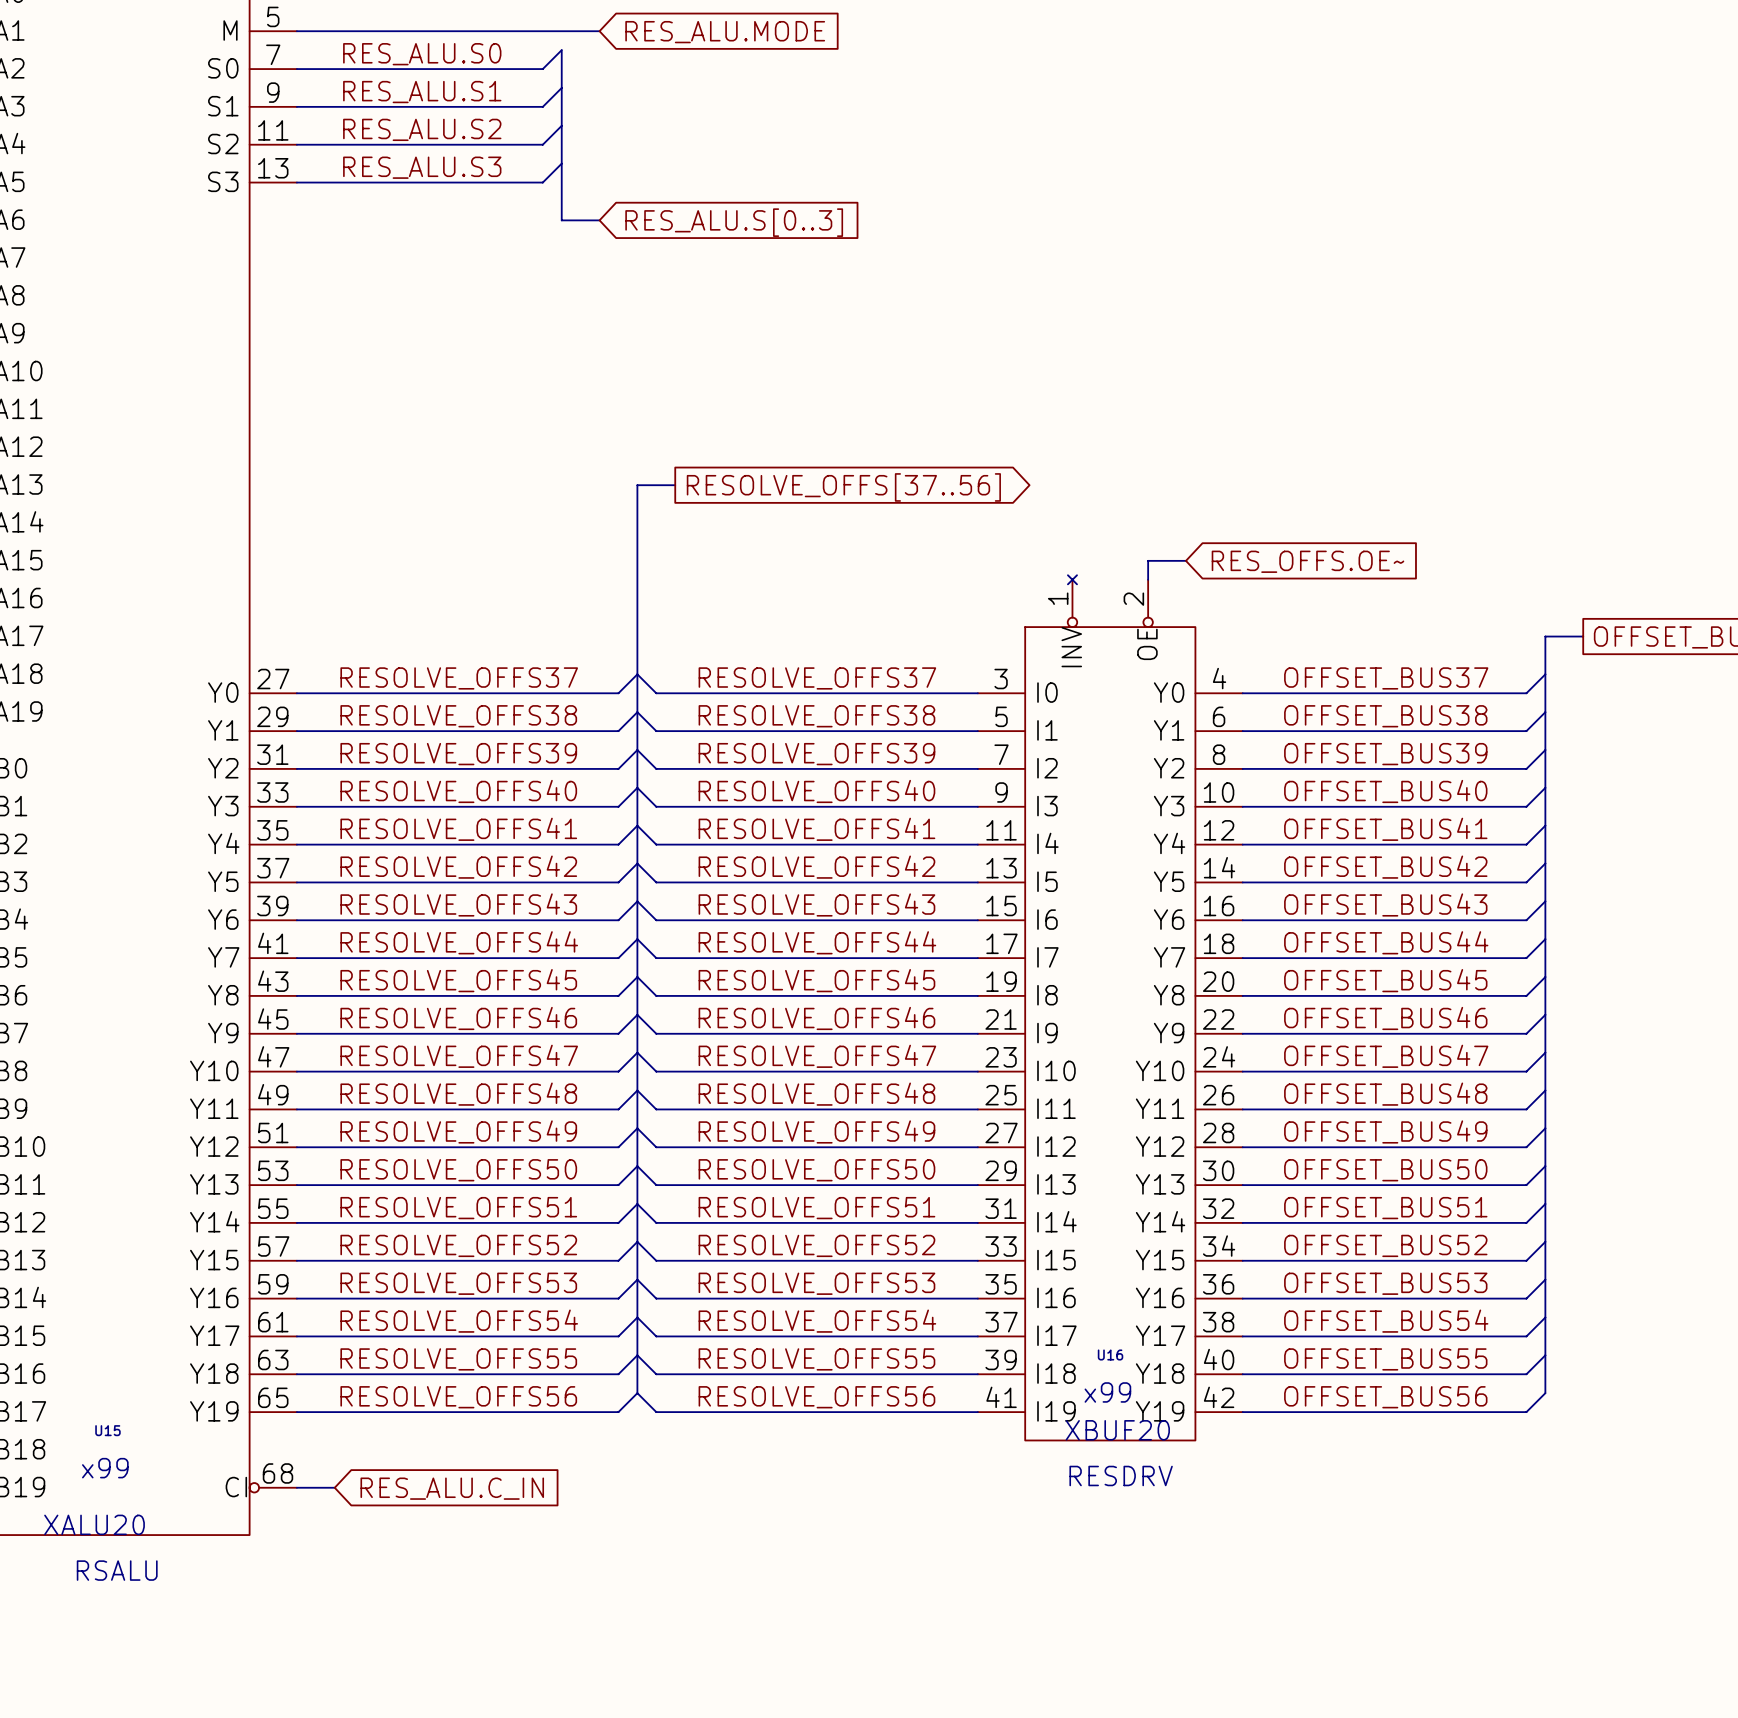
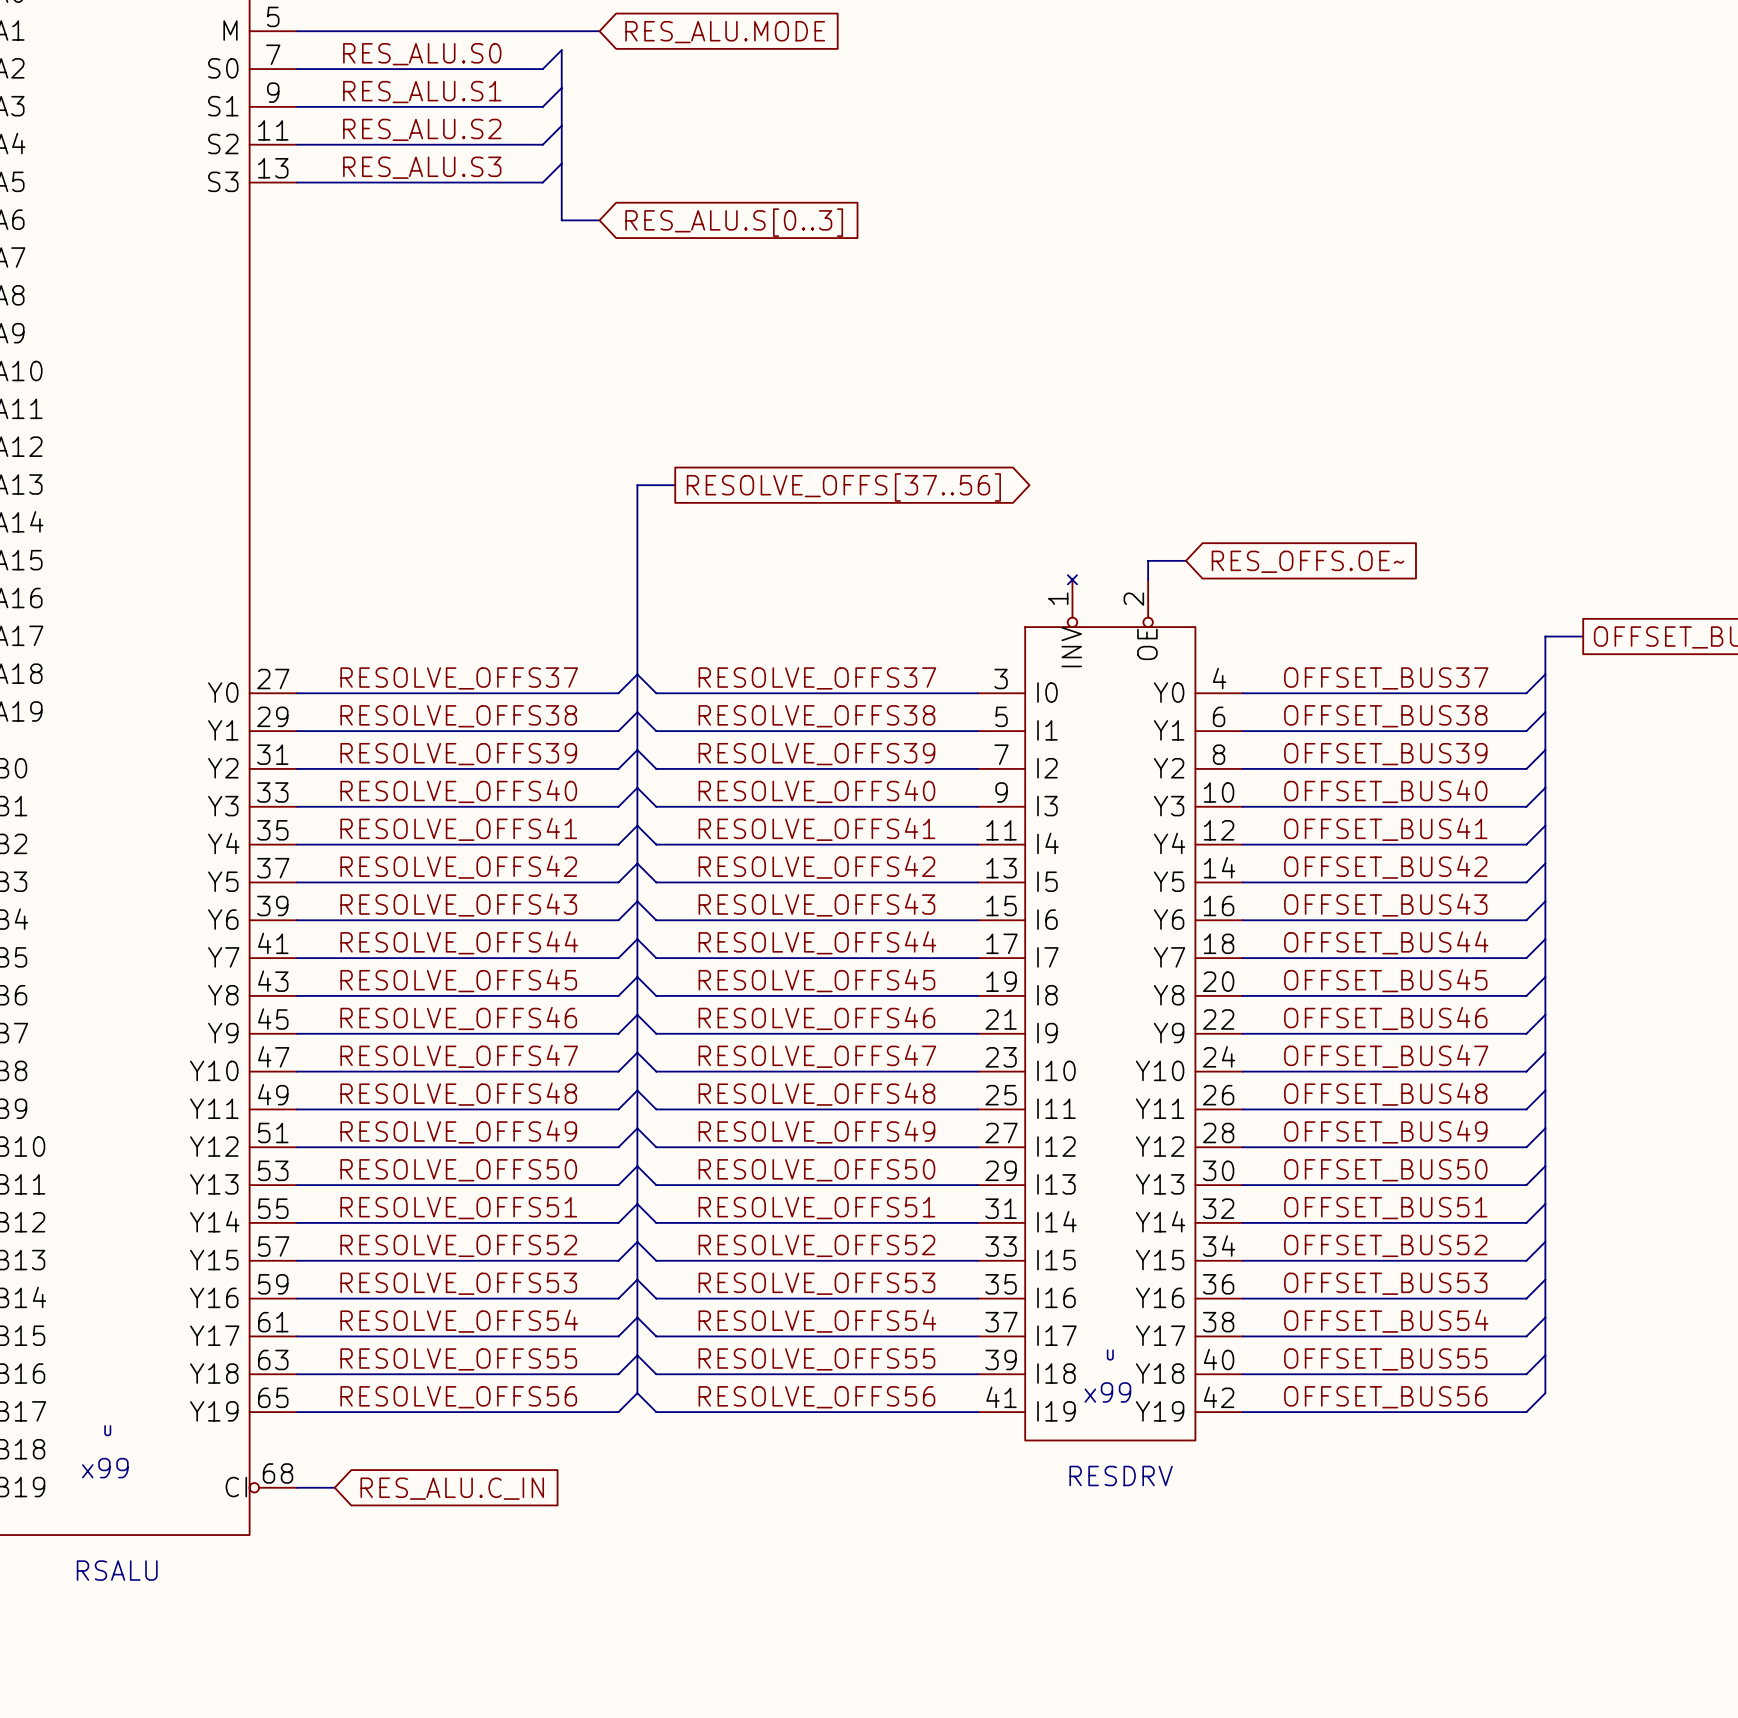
U16 name: U16 (1110, 1354) -> U (1110, 1354)
U15 name: U15 (107, 1430) -> U (107, 1430)
U16 value: XBUF20 (1117, 1430) -> none
U15 value: XALU20 (94, 1524) -> none

